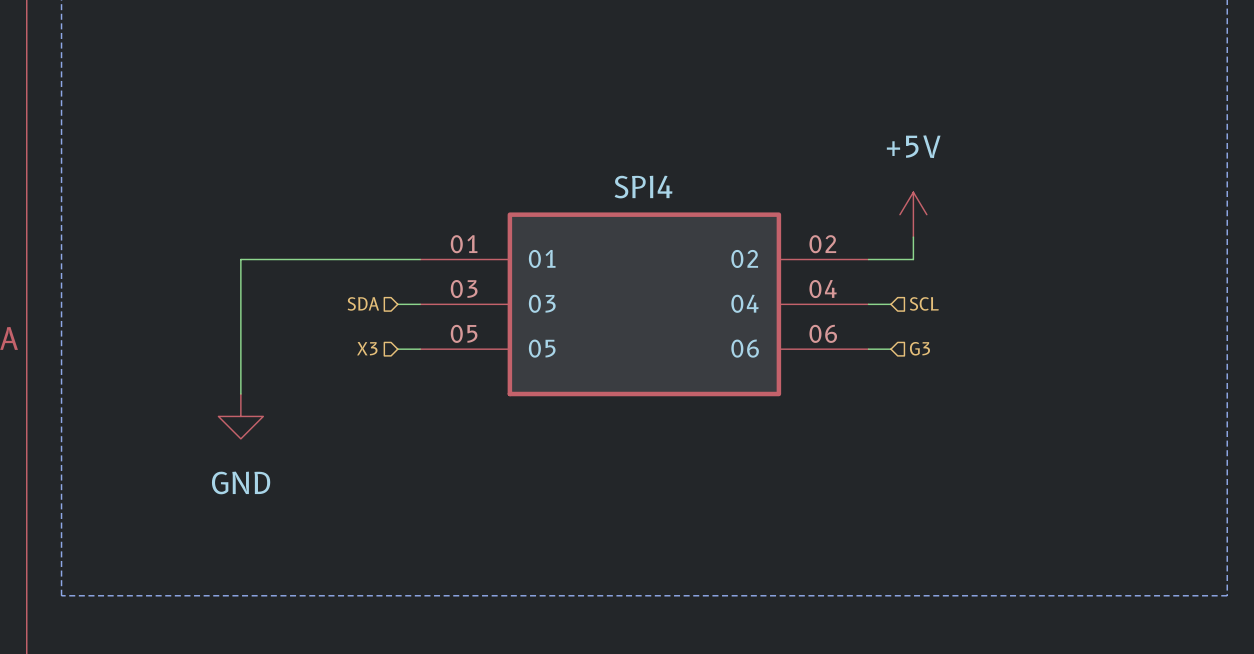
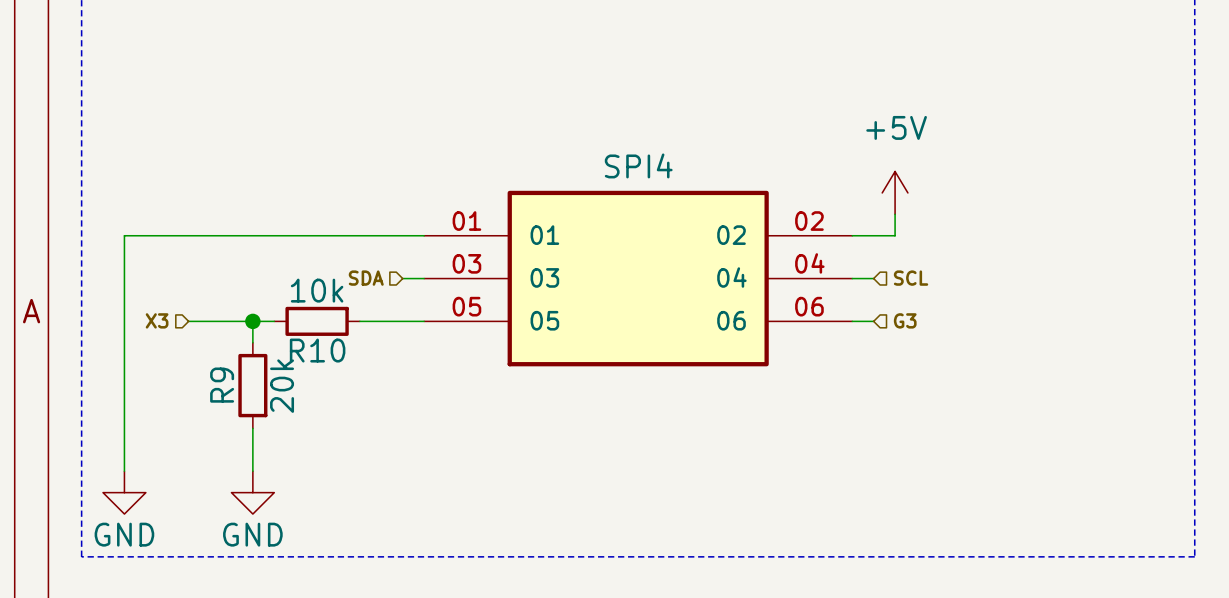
wire: (240, 259) (240, 349) -> (252, 235) (124, 235) (124, 471)
hierarchical label position: X3 (367, 348) -> X3 (157, 320)
wire: none -> (188, 321) (274, 321)
junction: none -> (252, 321)
R10: none -> 10k (317, 321)
wire: none -> (359, 321) (402, 321)
power symbol: GND (240, 416) -> none
R9: none -> 20k (252, 385)
wire: none -> (252, 428) (252, 471)
power symbol: none -> GND (124, 492)
power symbol: none -> GND (252, 492)

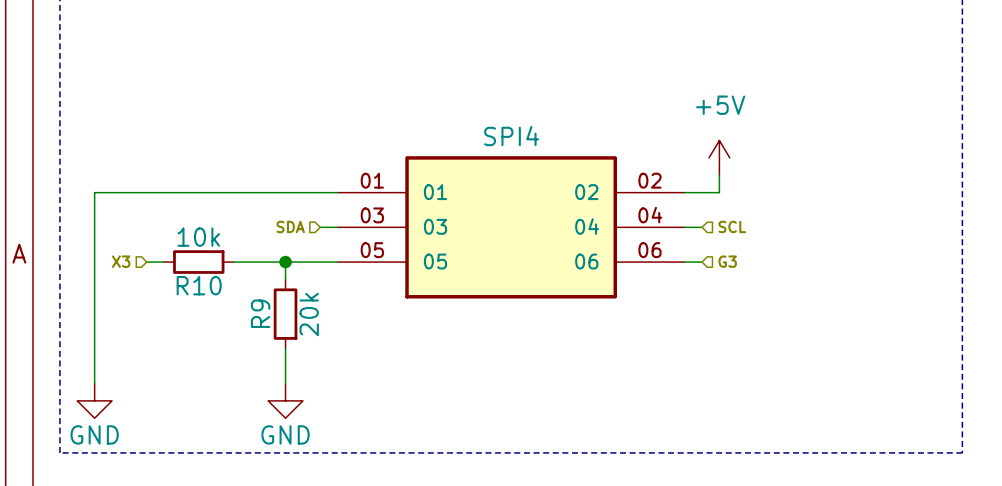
wire: (210, 321) (274, 321) -> none
wire: (252, 321) (252, 342) -> none
junction: (252, 321) -> none
wire: none -> (233, 262) (285, 262) (285, 279)
R10 position: (317, 321) -> (198, 262)
junction: none -> (285, 262)
R9 position: (252, 385) -> (285, 314)
wire: (252, 428) (252, 471) -> (285, 348) (285, 383)
power symbol position: GND (252, 492) -> GND (285, 400)

